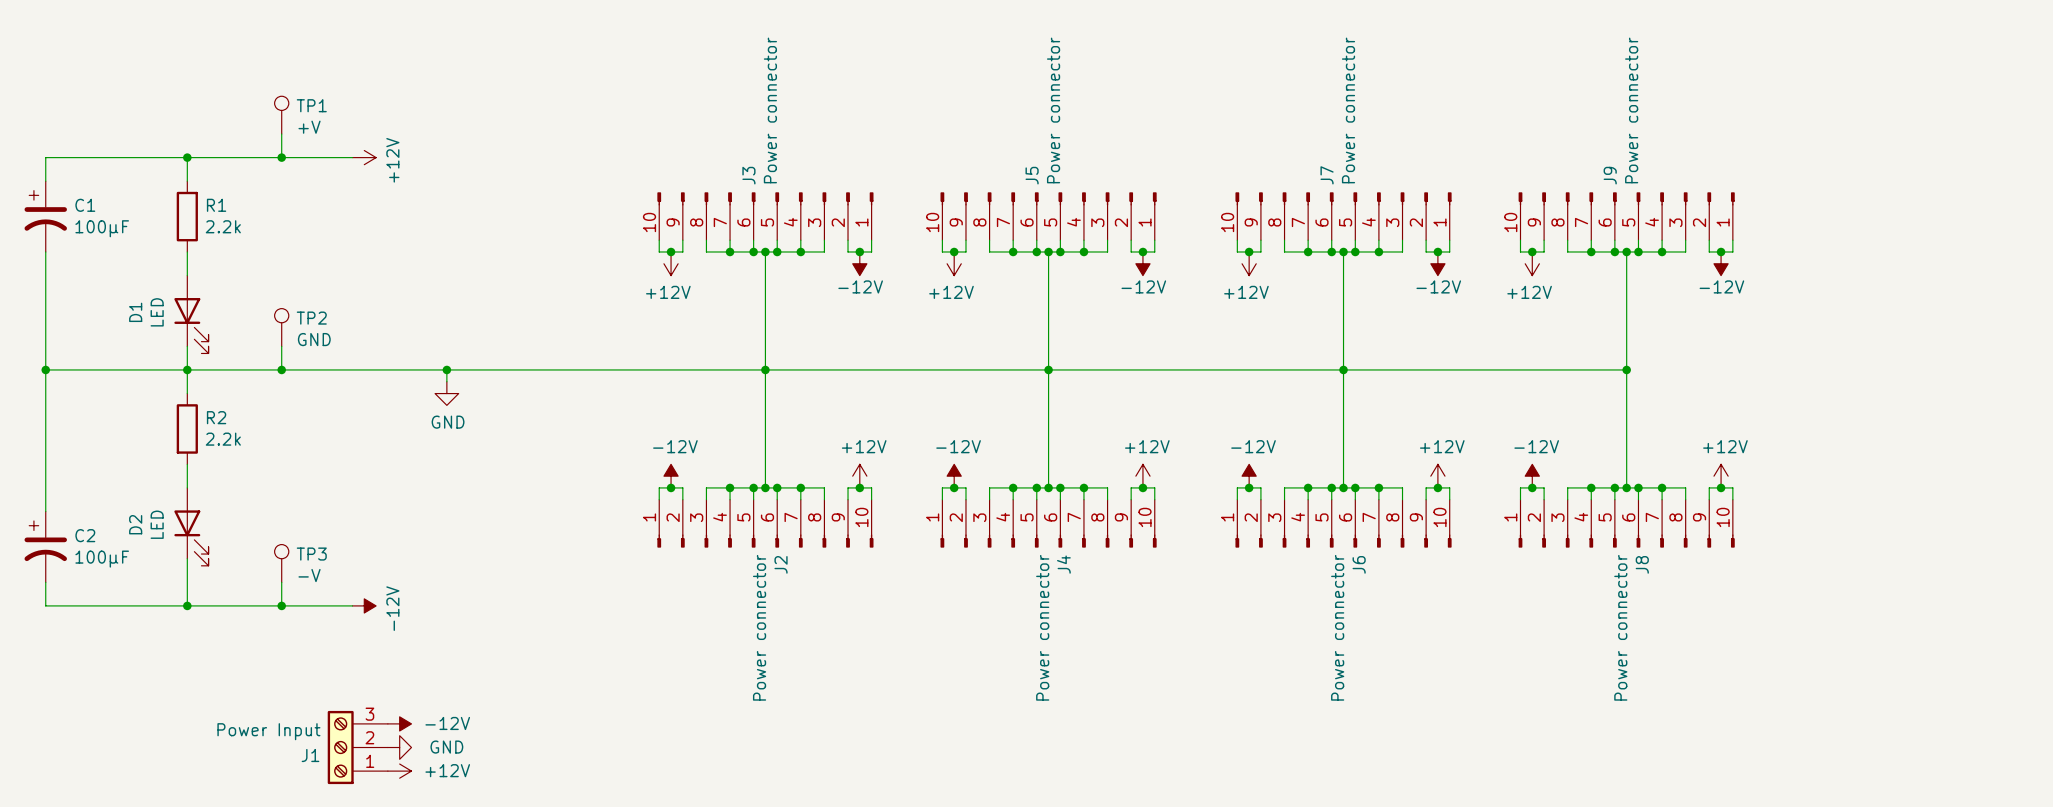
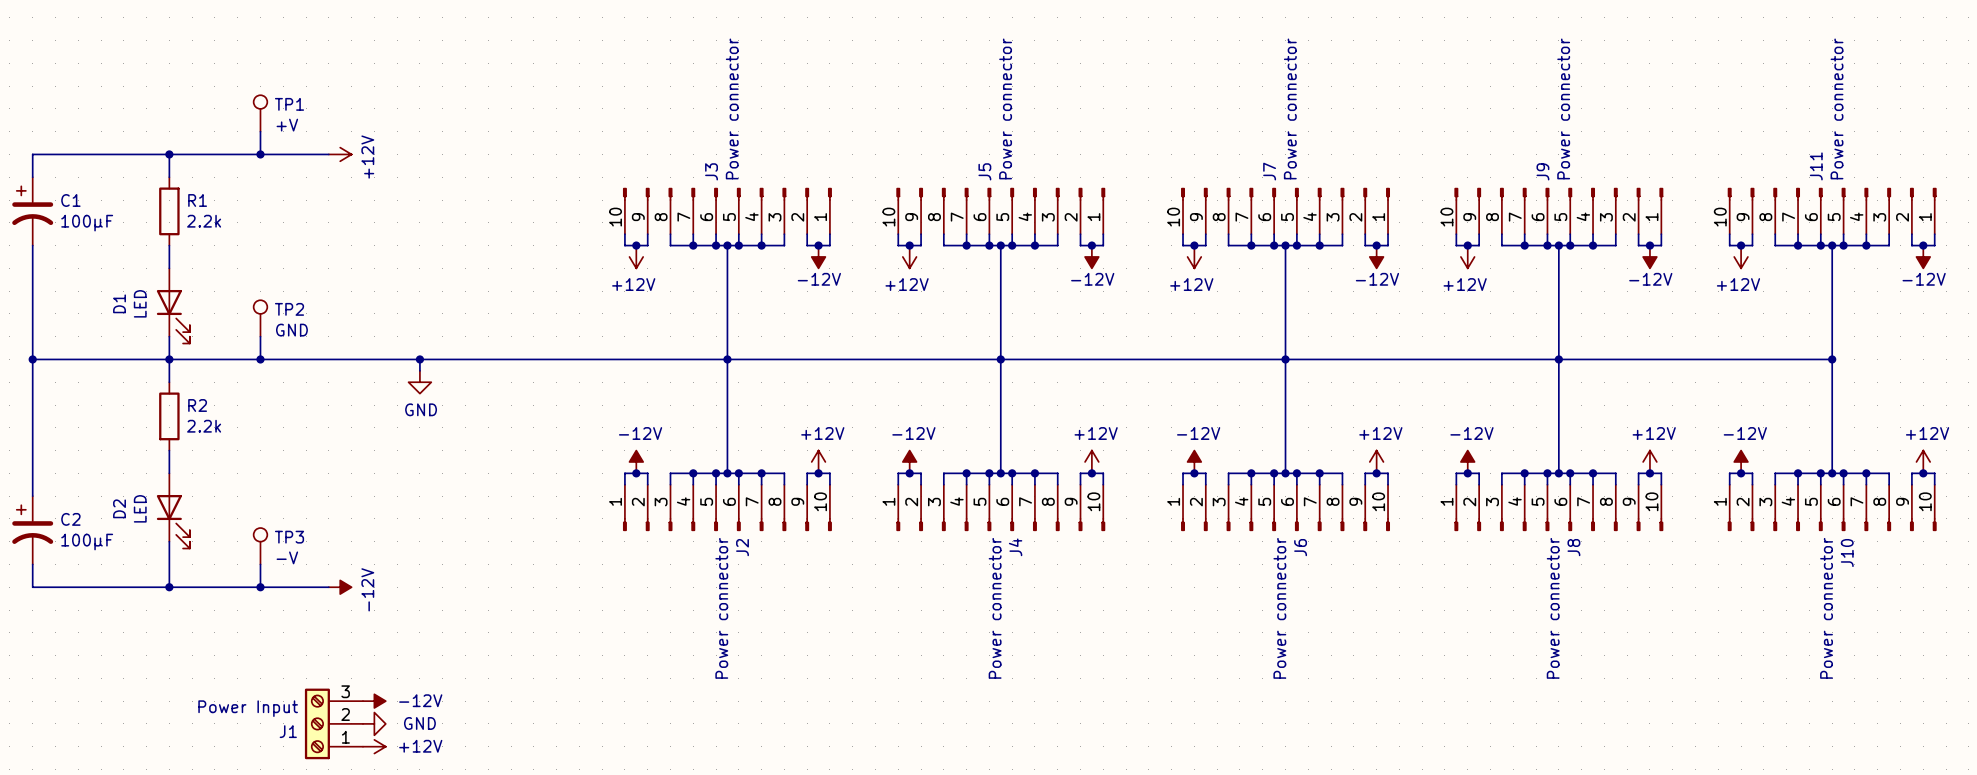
J11: none -> Power connector (1832, 211)
wire: none -> (1729, 234) (1729, 245) (1752, 245) (1752, 234)
wire: none -> (1775, 234) (1775, 245) (1889, 245) (1889, 234)
wire: none -> (1798, 234) (1798, 245)
wire: none -> (1820, 234) (1820, 245)
wire: none -> (1843, 234) (1843, 245)
wire: none -> (1866, 234) (1866, 245)
wire: none -> (1911, 234) (1911, 245) (1934, 245) (1934, 234)
junction: none -> (1741, 245)
junction: none -> (1798, 245)
junction: none -> (1820, 245)
wire: none -> (1832, 245) (1832, 473)
junction: none -> (1832, 245)
junction: none -> (1843, 245)
junction: none -> (1866, 245)
junction: none -> (1923, 245)
power symbol: none -> +12V (1741, 256)
power symbol: none -> -12V (1923, 256)
wire: none -> (1558, 359) (1832, 359)
junction: none -> (1832, 359)
power symbol: none -> -12V (1741, 461)
power symbol: none -> +12V (1923, 461)
junction: none -> (1741, 473)
wire: none -> (1798, 473) (1798, 484)
junction: none -> (1798, 473)
wire: none -> (1820, 473) (1820, 484)
junction: none -> (1820, 473)
junction: none -> (1832, 473)
wire: none -> (1843, 473) (1843, 484)
junction: none -> (1843, 473)
wire: none -> (1866, 473) (1866, 484)
junction: none -> (1866, 473)
junction: none -> (1923, 473)
wire: none -> (1729, 484) (1729, 473) (1752, 473) (1752, 484)
wire: none -> (1775, 484) (1775, 473) (1889, 473) (1889, 484)
wire: none -> (1911, 484) (1911, 473) (1934, 473) (1934, 484)
J10: none -> Power connector (1832, 507)

